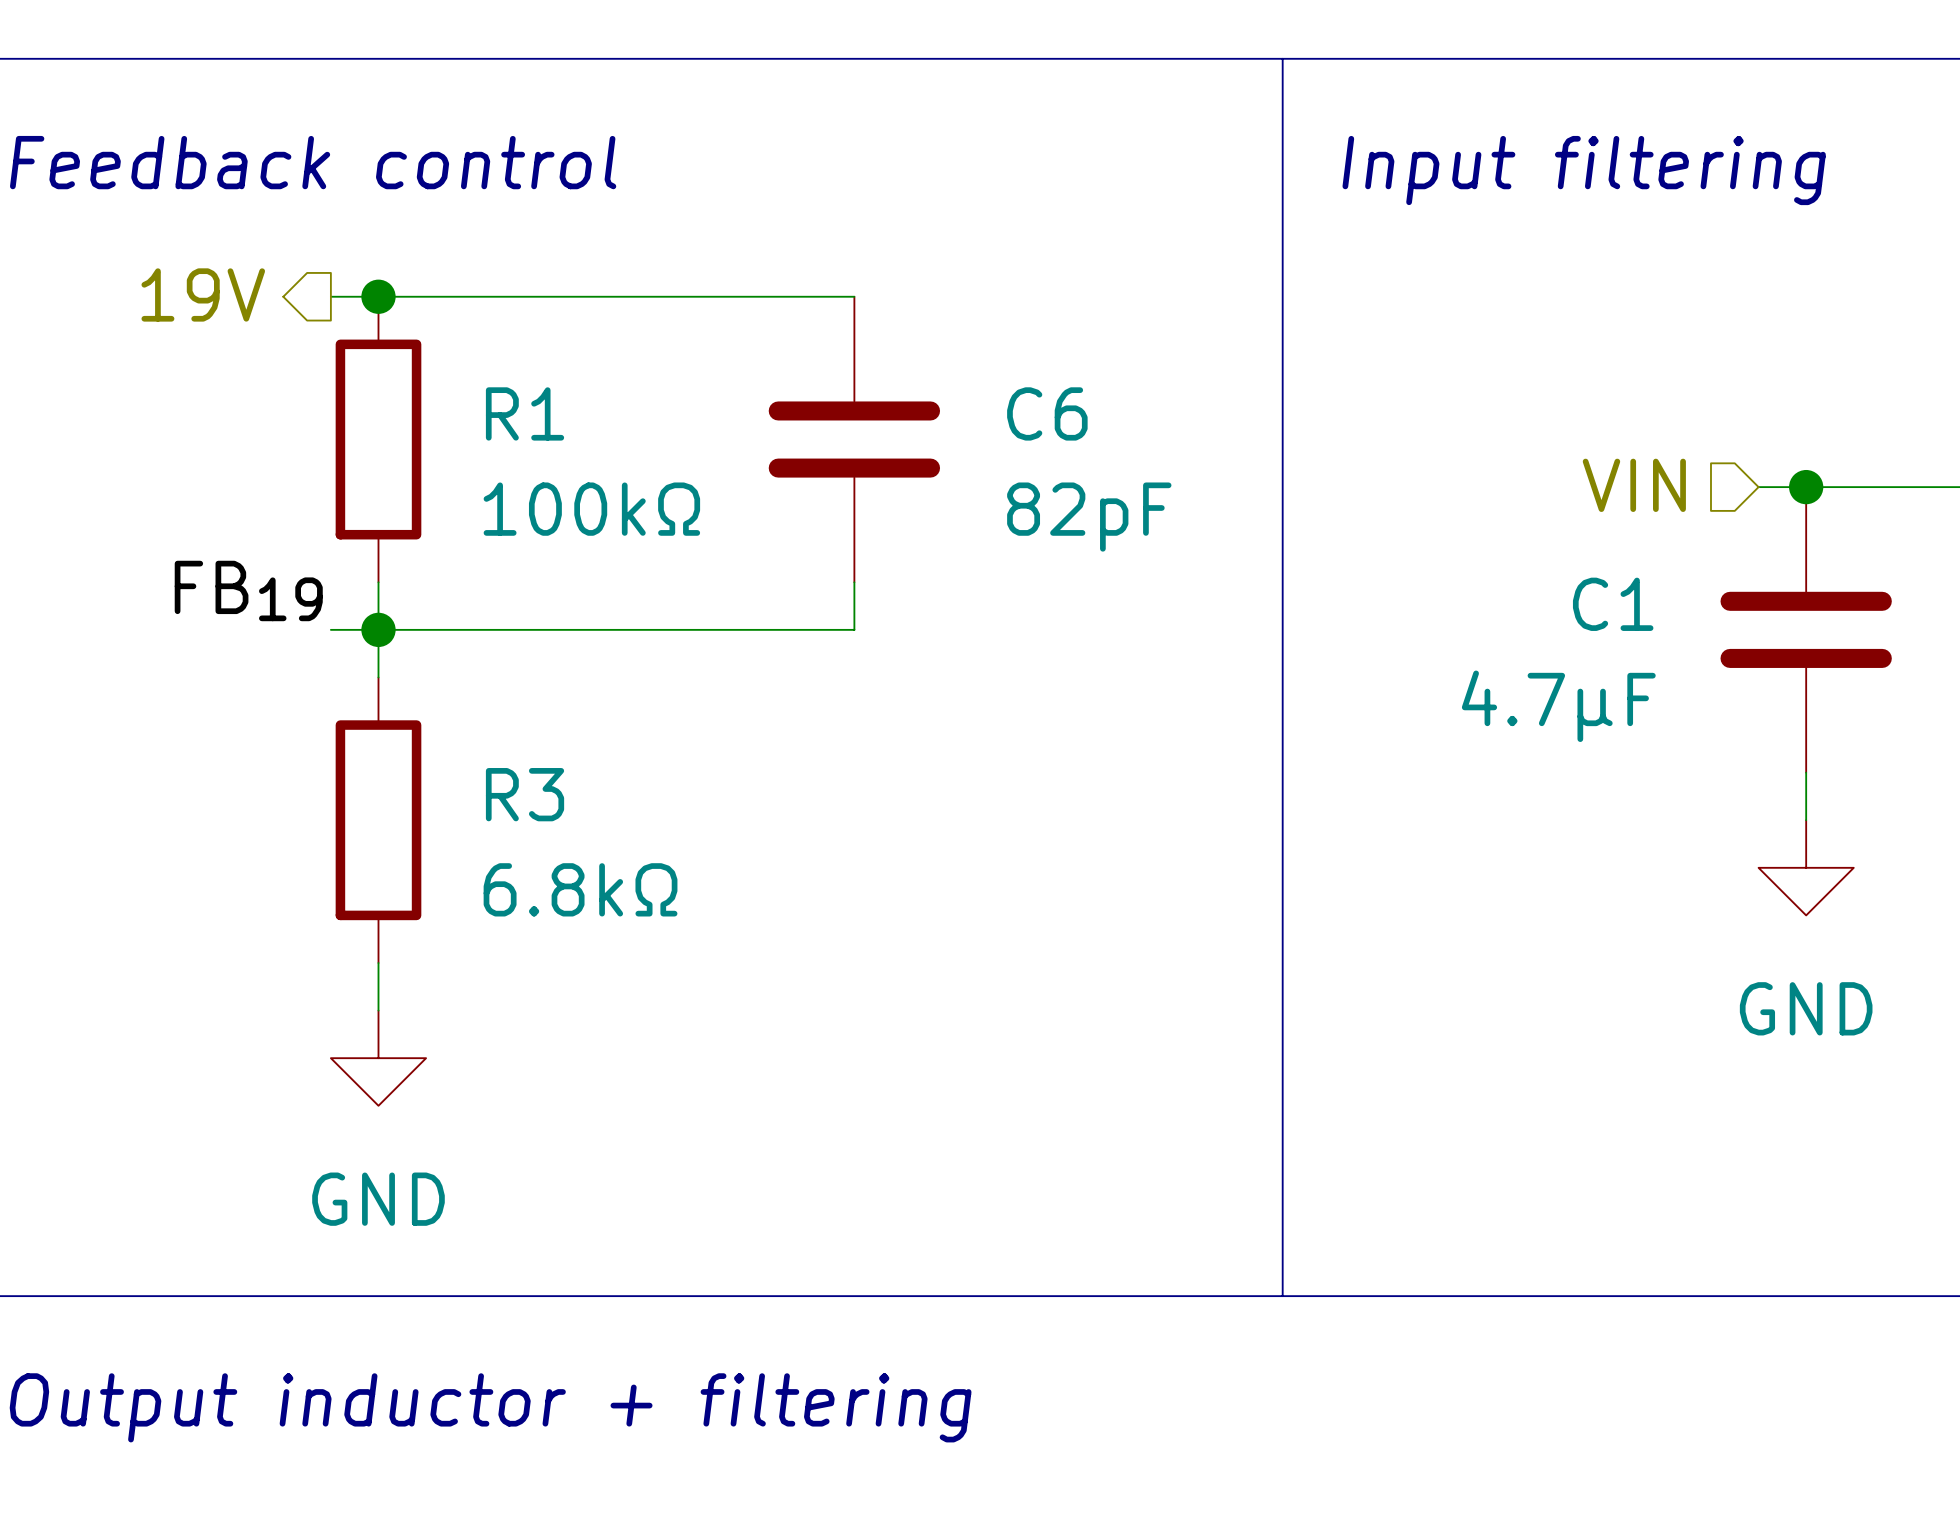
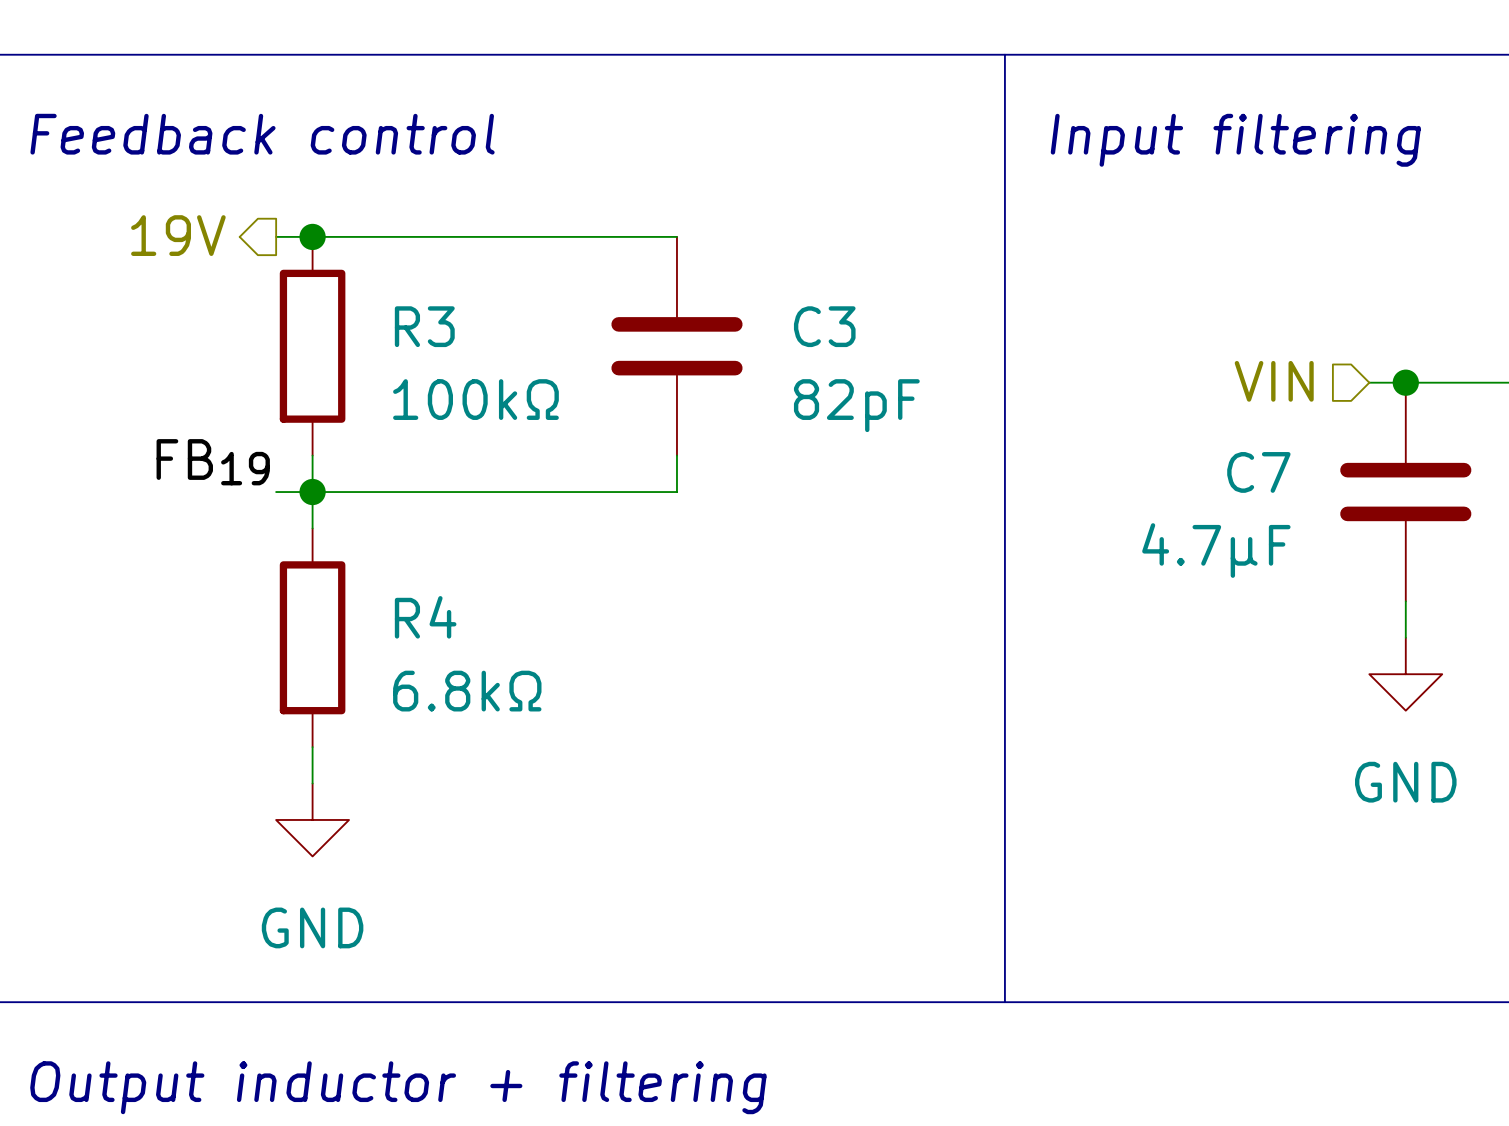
R1 name: R1 (525, 413) -> R3 (424, 326)
C6 name: C6 (1047, 413) -> C3 (824, 326)
C1 name: C1 (1613, 604) -> C7 (1258, 472)
R3 name: R3 (525, 794) -> R4 (425, 617)

